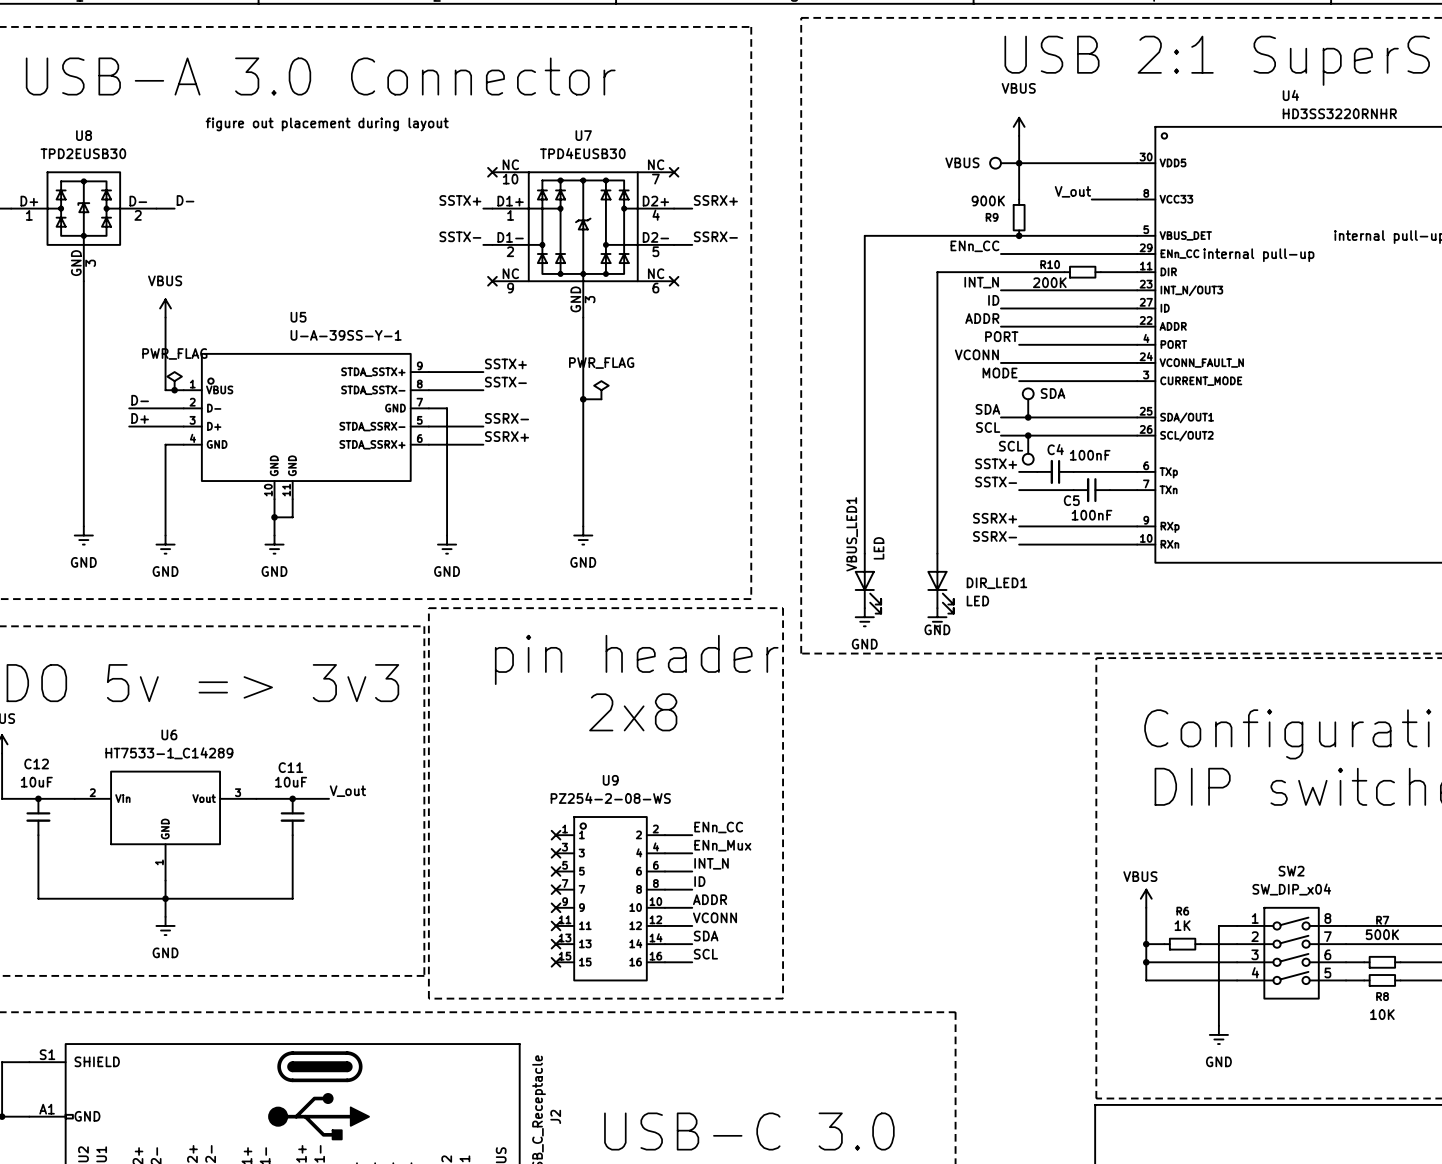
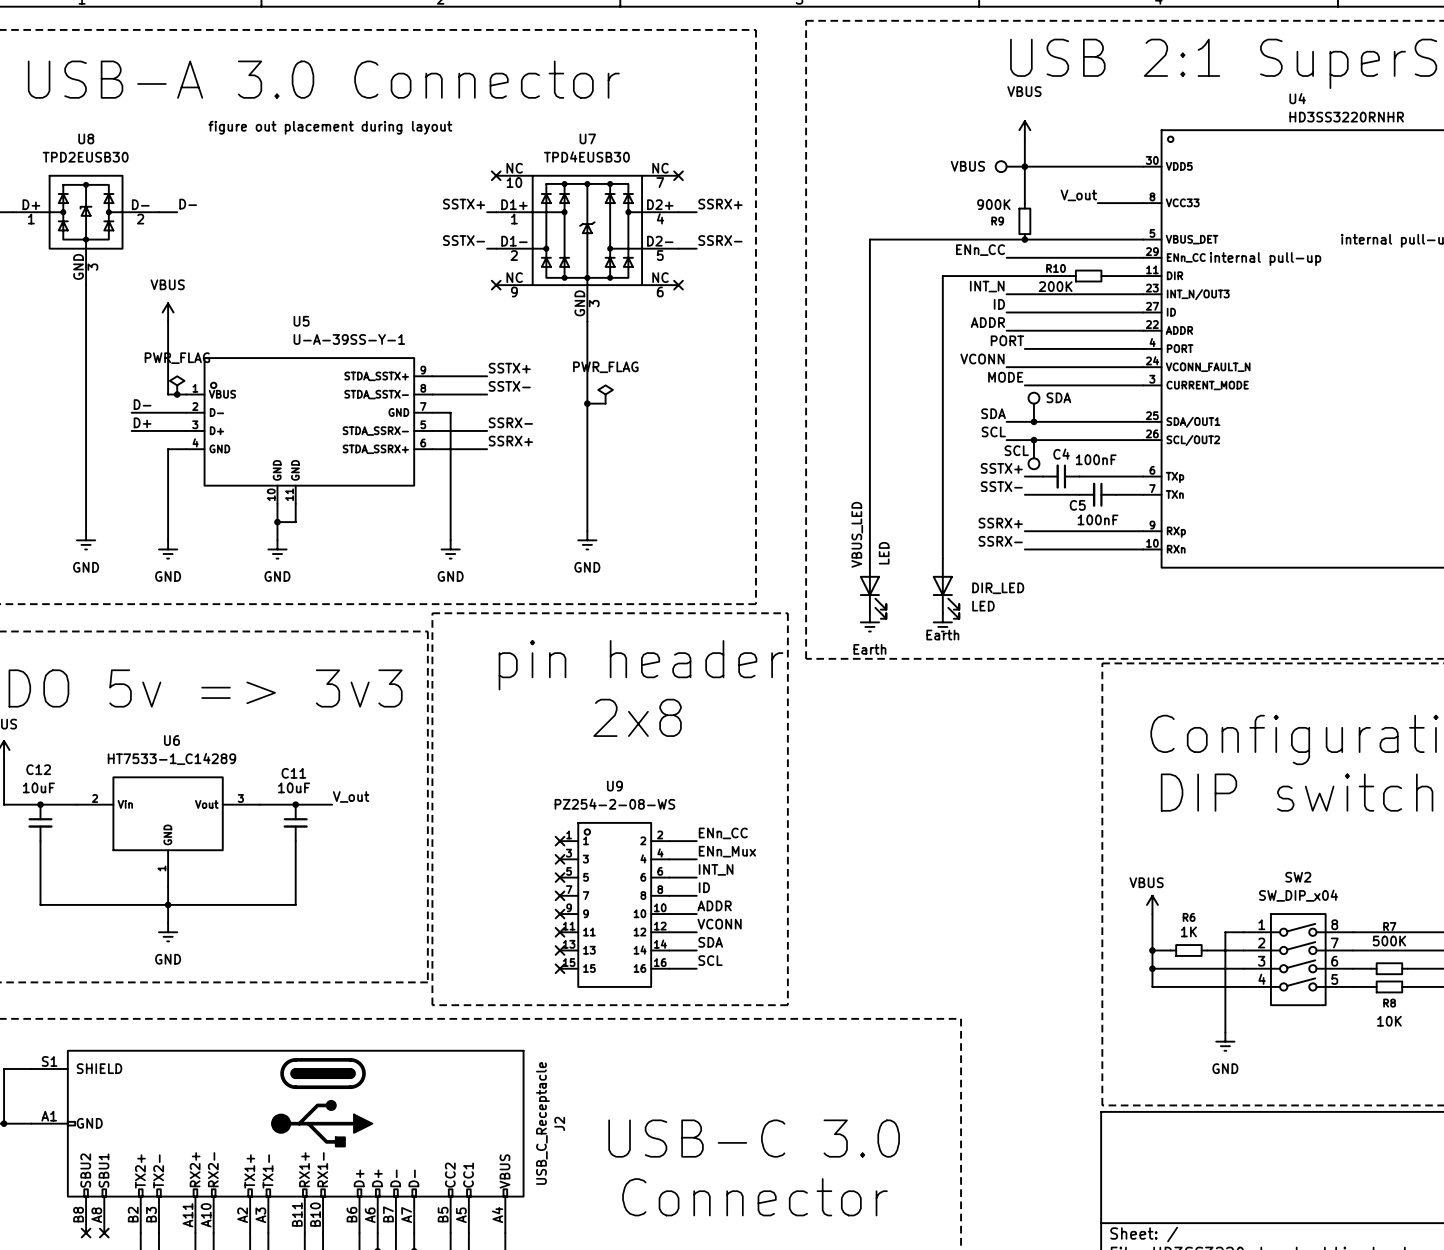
VBUS_LED1 name: VBUS_LED1 (852, 534) -> VBUS_LED (857, 534)
DIR_LED1 name: DIR_LED1 (996, 583) -> DIR_LED (998, 588)
power symbol: GND (864, 617) -> Earth (869, 622)
power symbol: GND (937, 617) -> Earth (942, 622)

